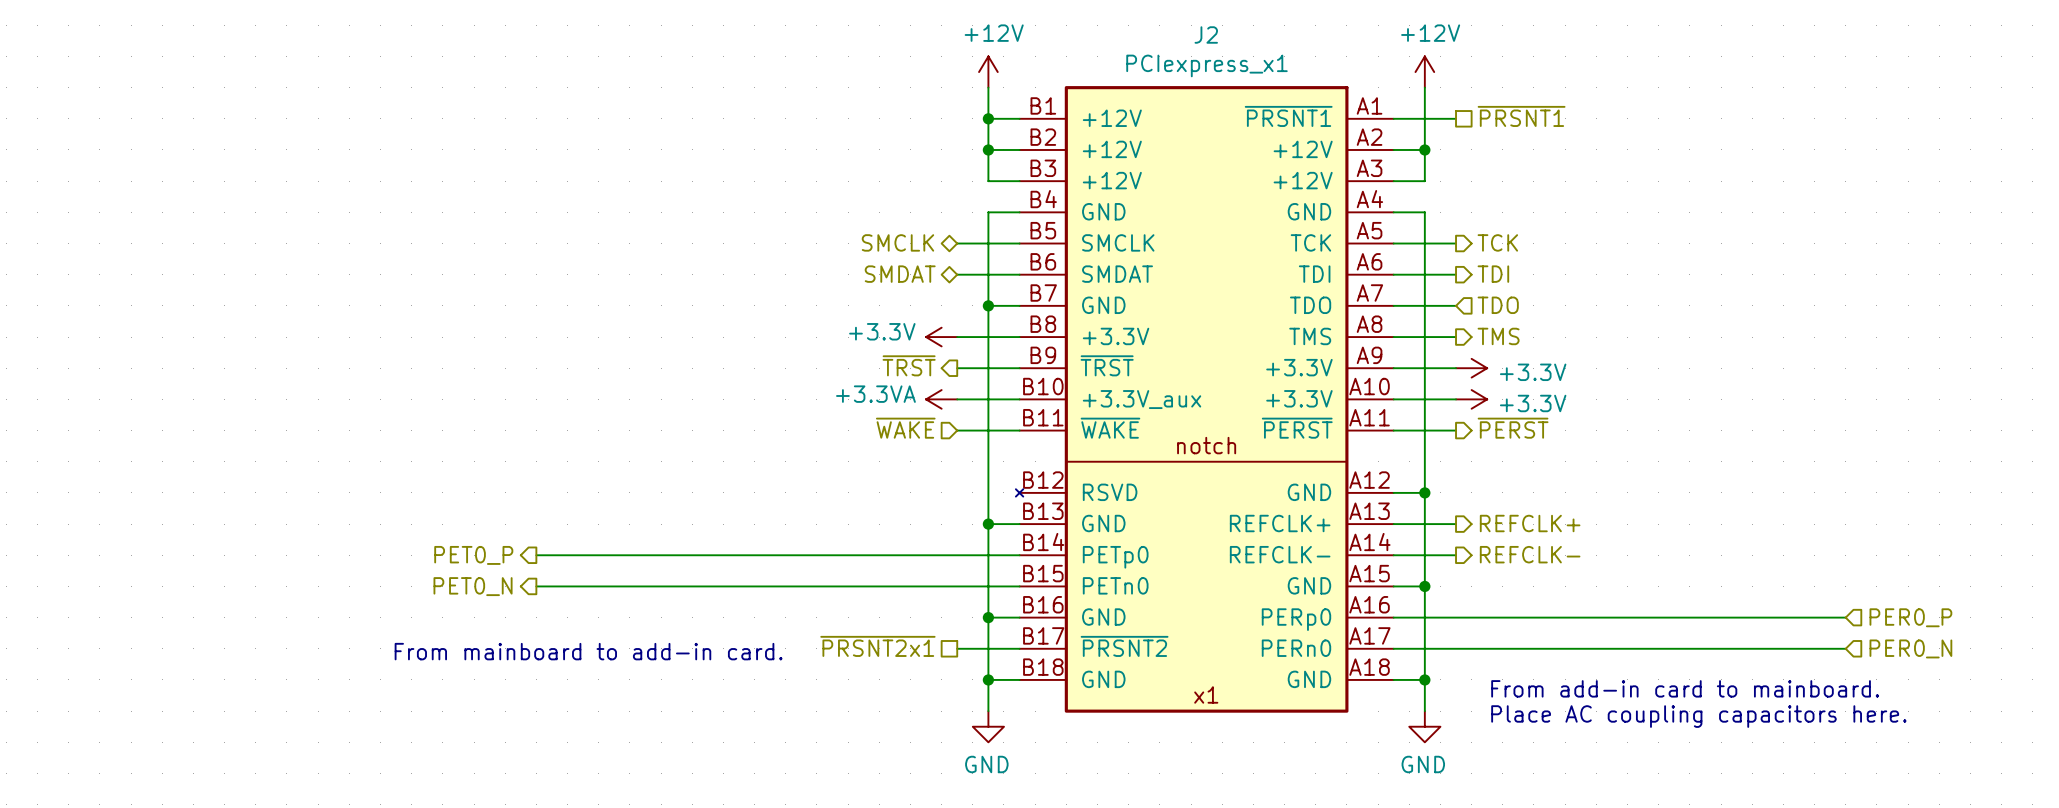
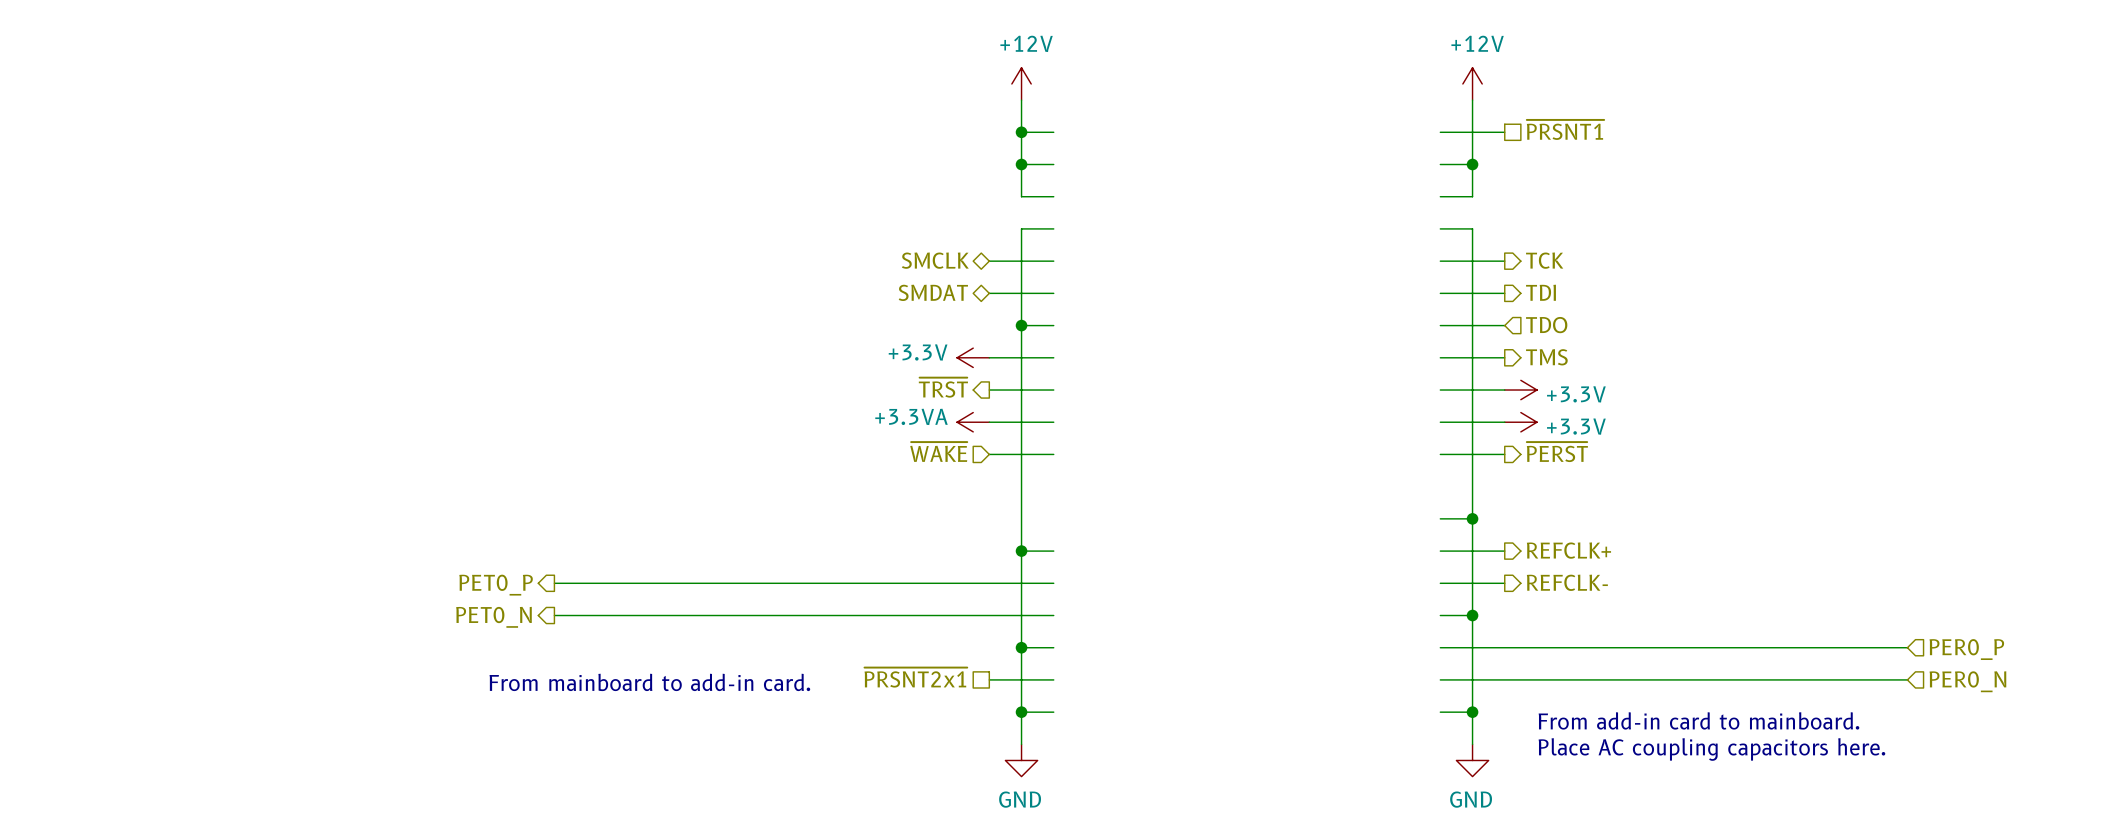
J2: PCIexpress_x1 (1204, 399) -> none

